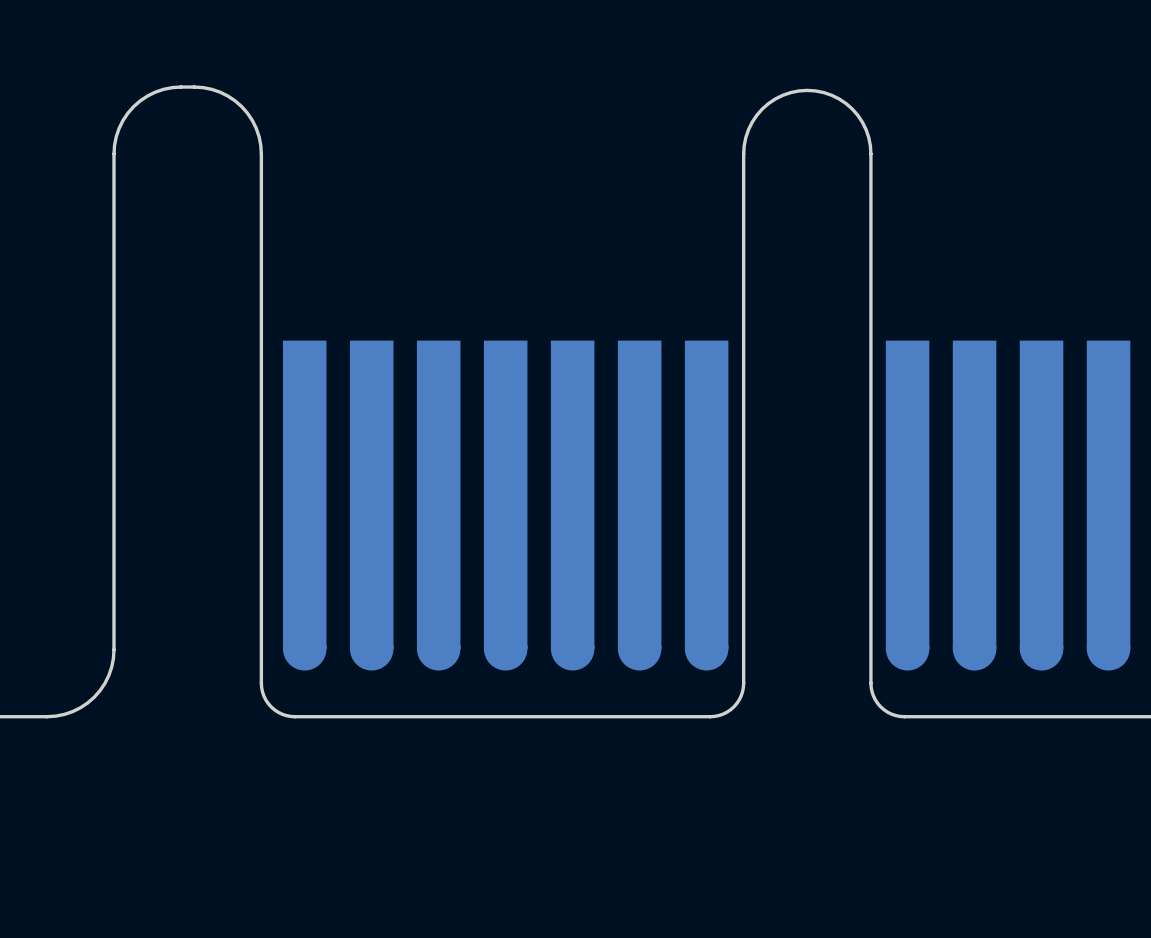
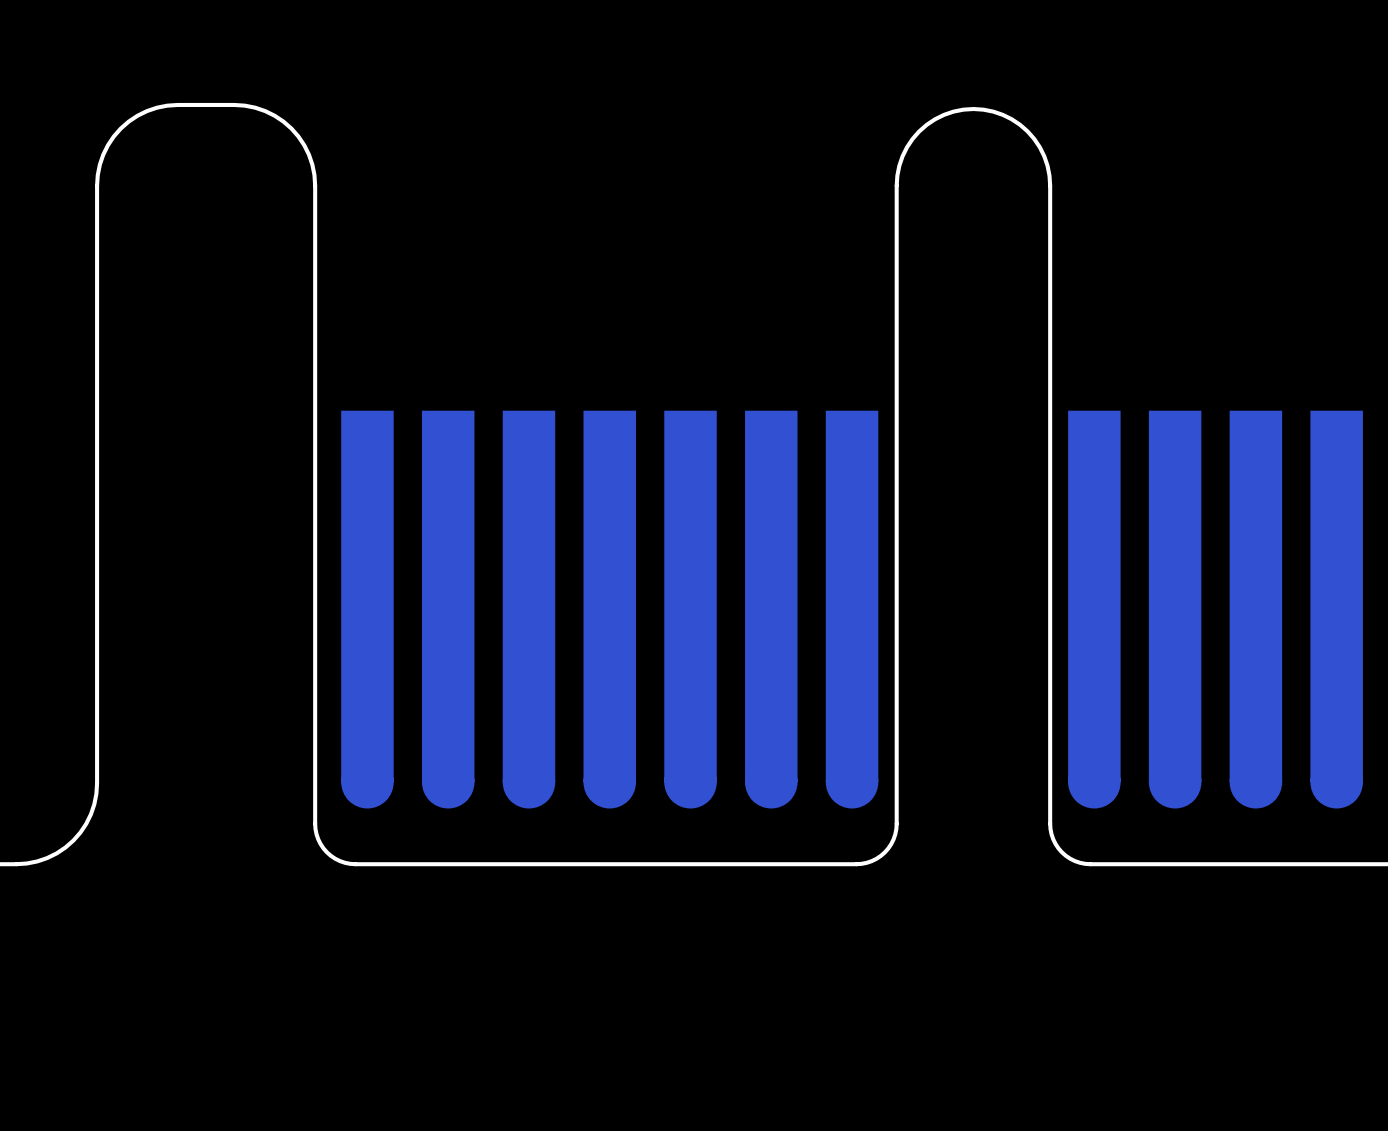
board edge: (180, 87) (155, 92) (133, 106) (122, 120) (114, 145) (114, 649) (111, 667) (100, 690) (80, 707) (55, 716) (13, 716) -> (218, 104) (167, 105) (137, 115) (113, 136) (99, 164) (97, 185) (96, 793) (86, 823) (73, 840) (47, 858) (16, 864)

